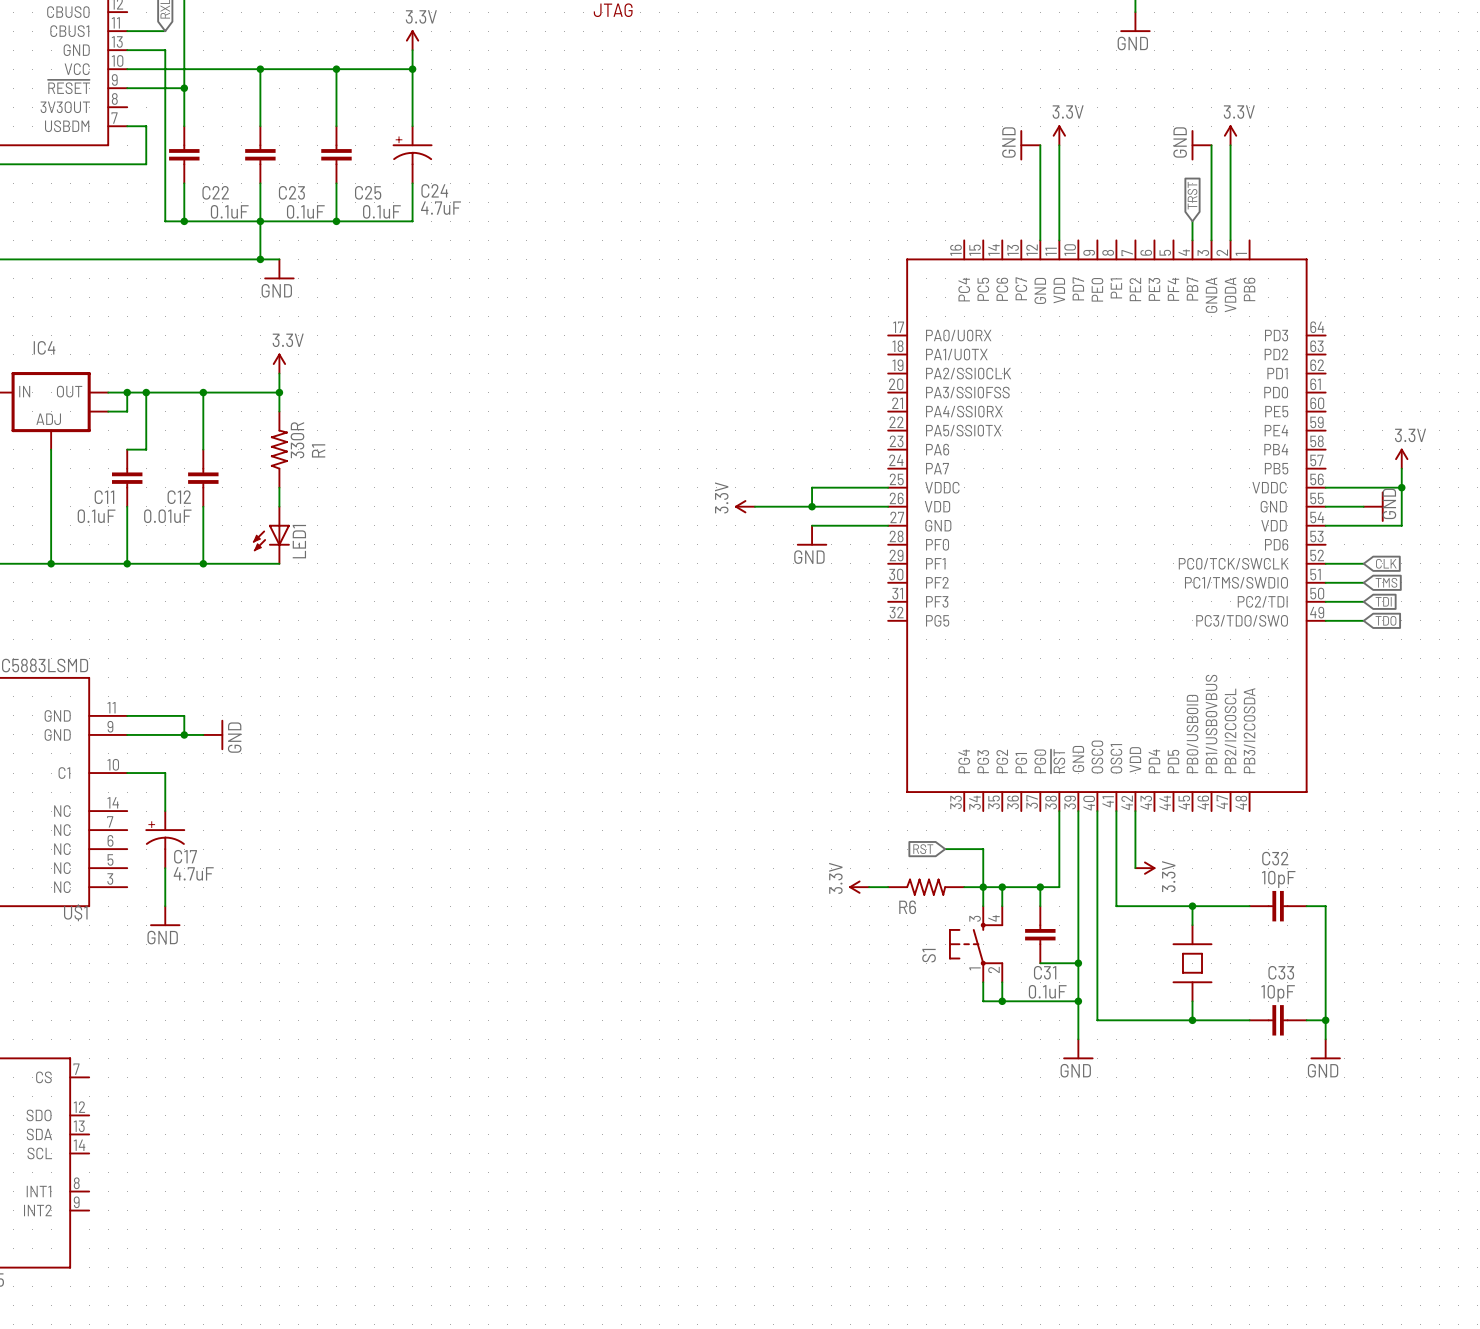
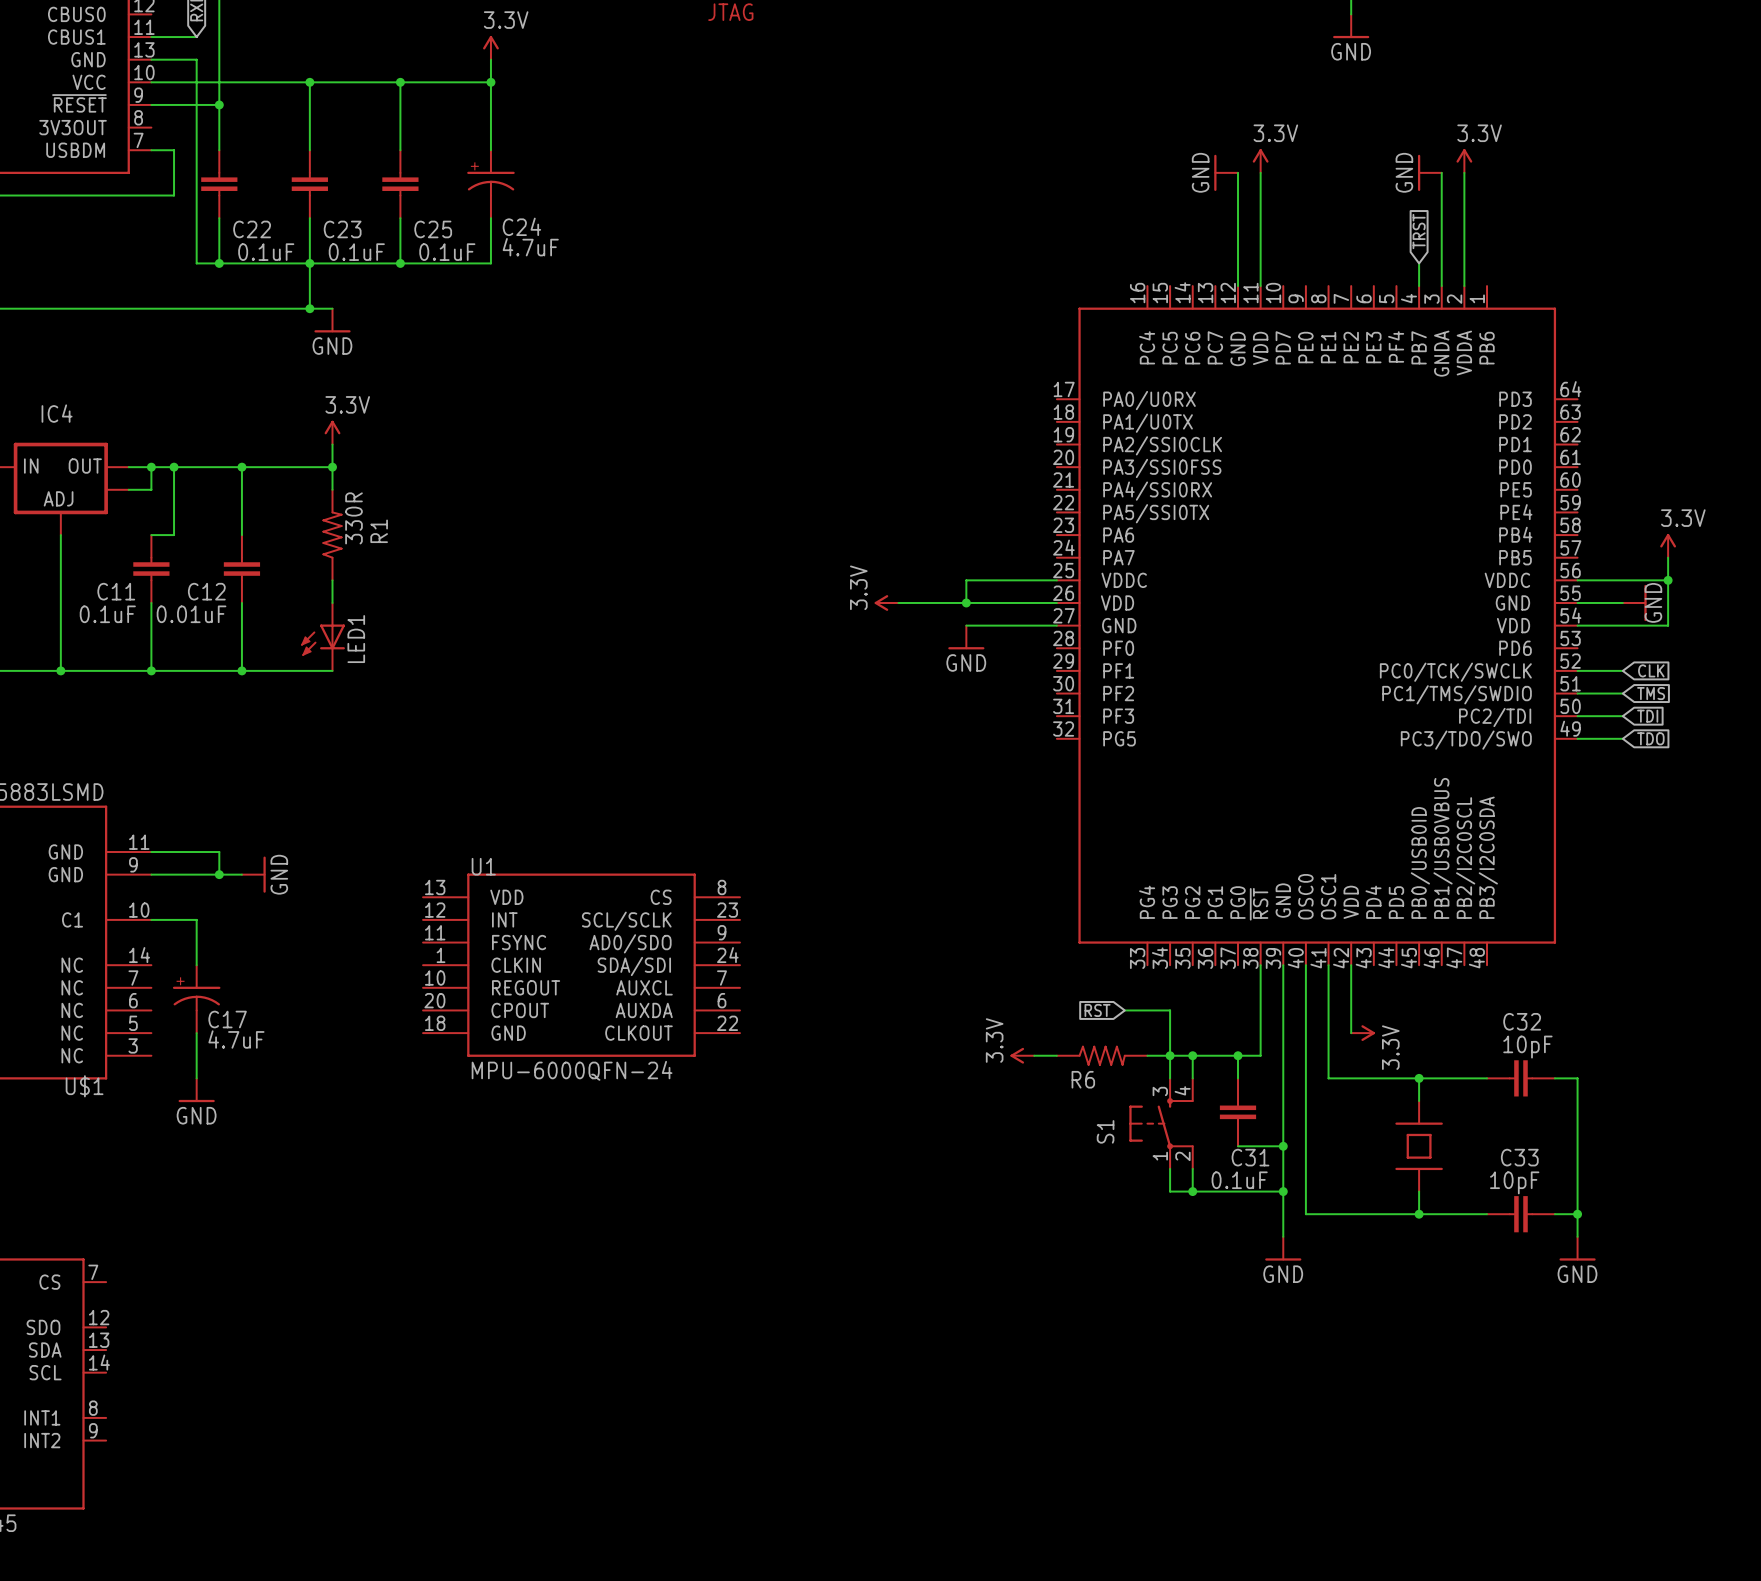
U1: none -> MPU-6000QFN-24 (581, 965)

